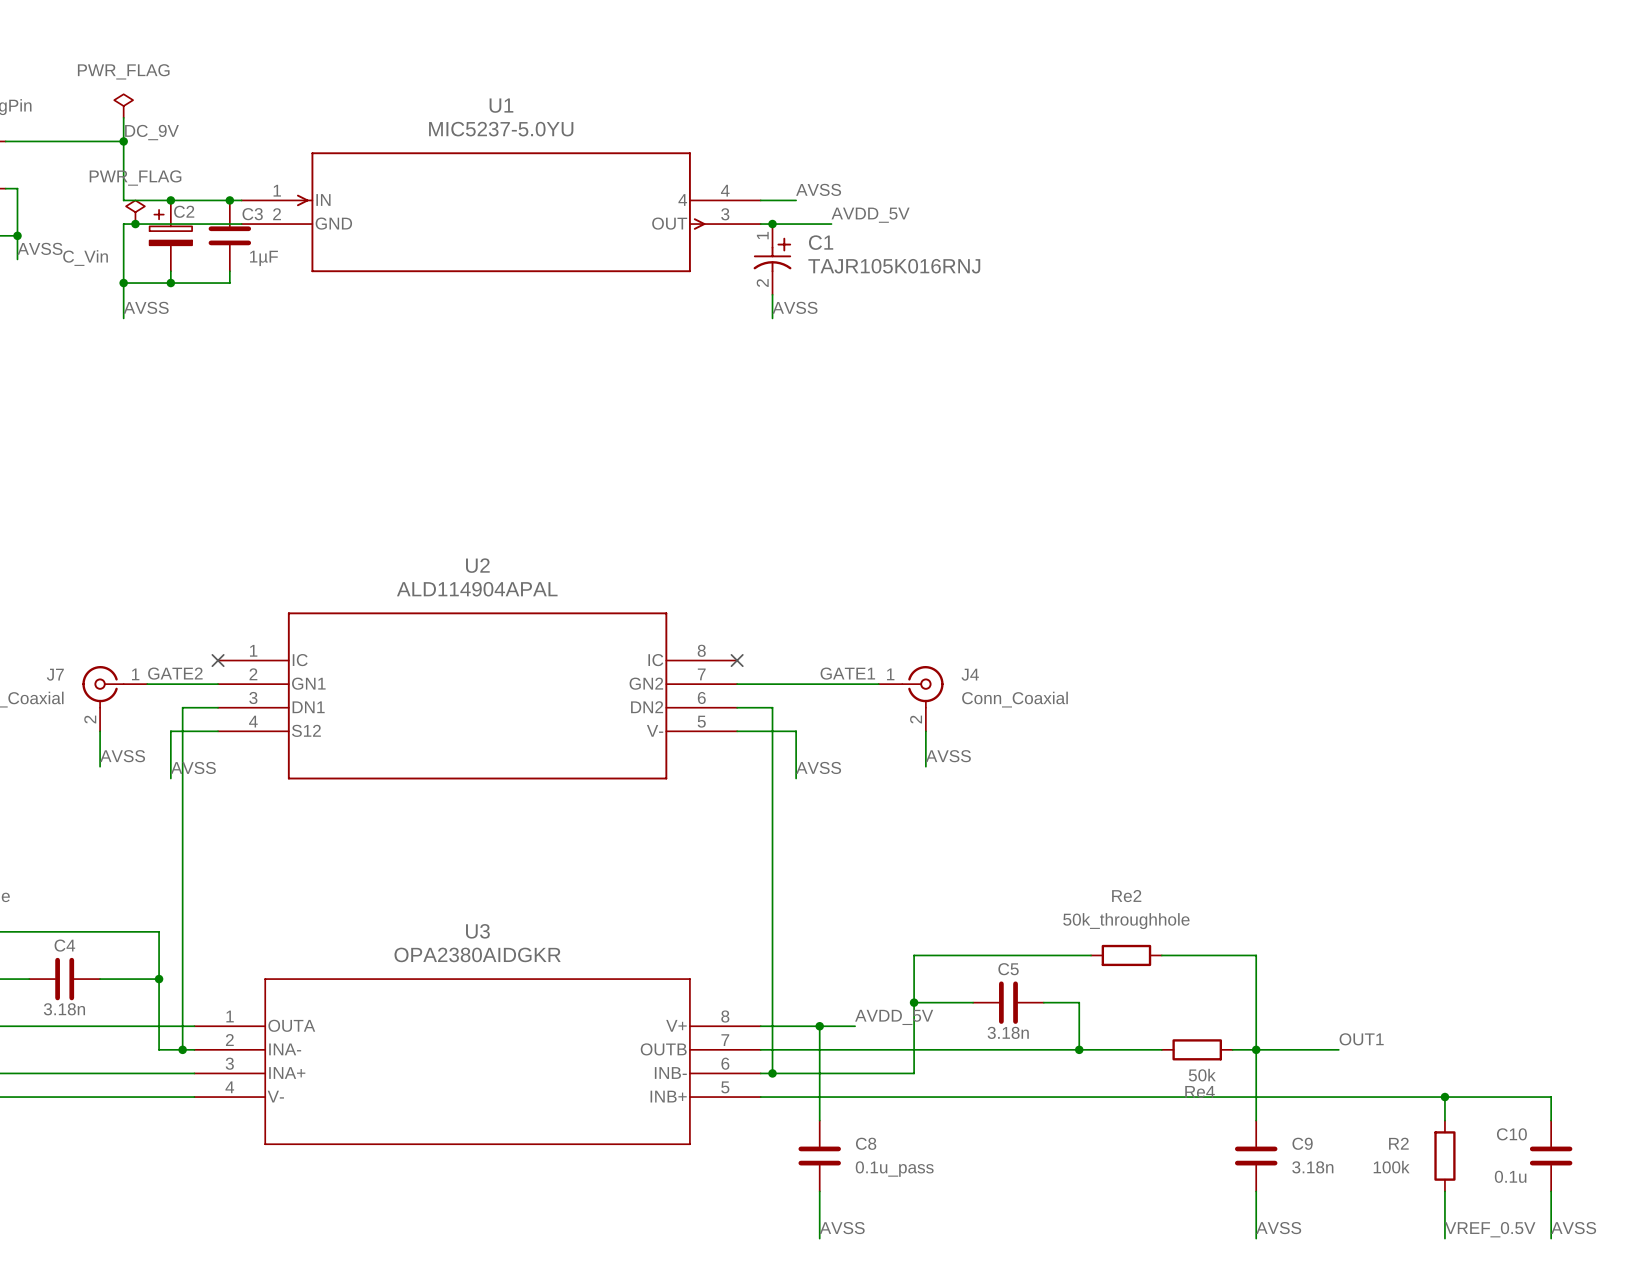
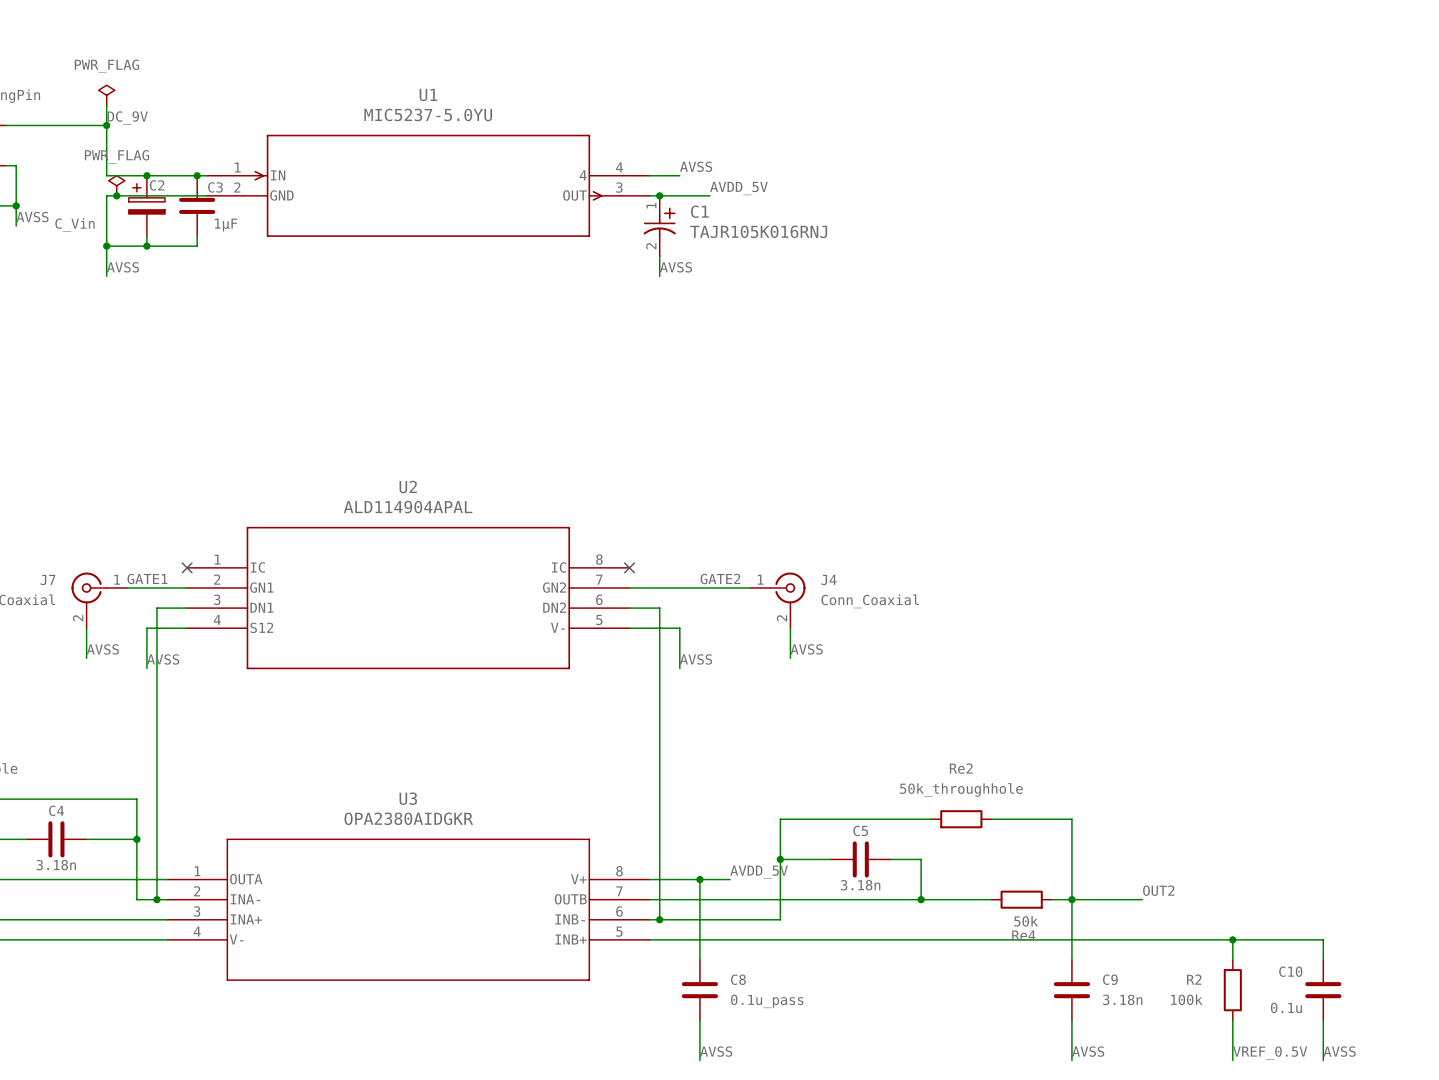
label: GATE2 (175, 673) -> GATE1 (147, 579)
label: GATE1 (847, 673) -> GATE2 (720, 579)
label: OUT1 (1361, 1039) -> OUT2 (1158, 890)

